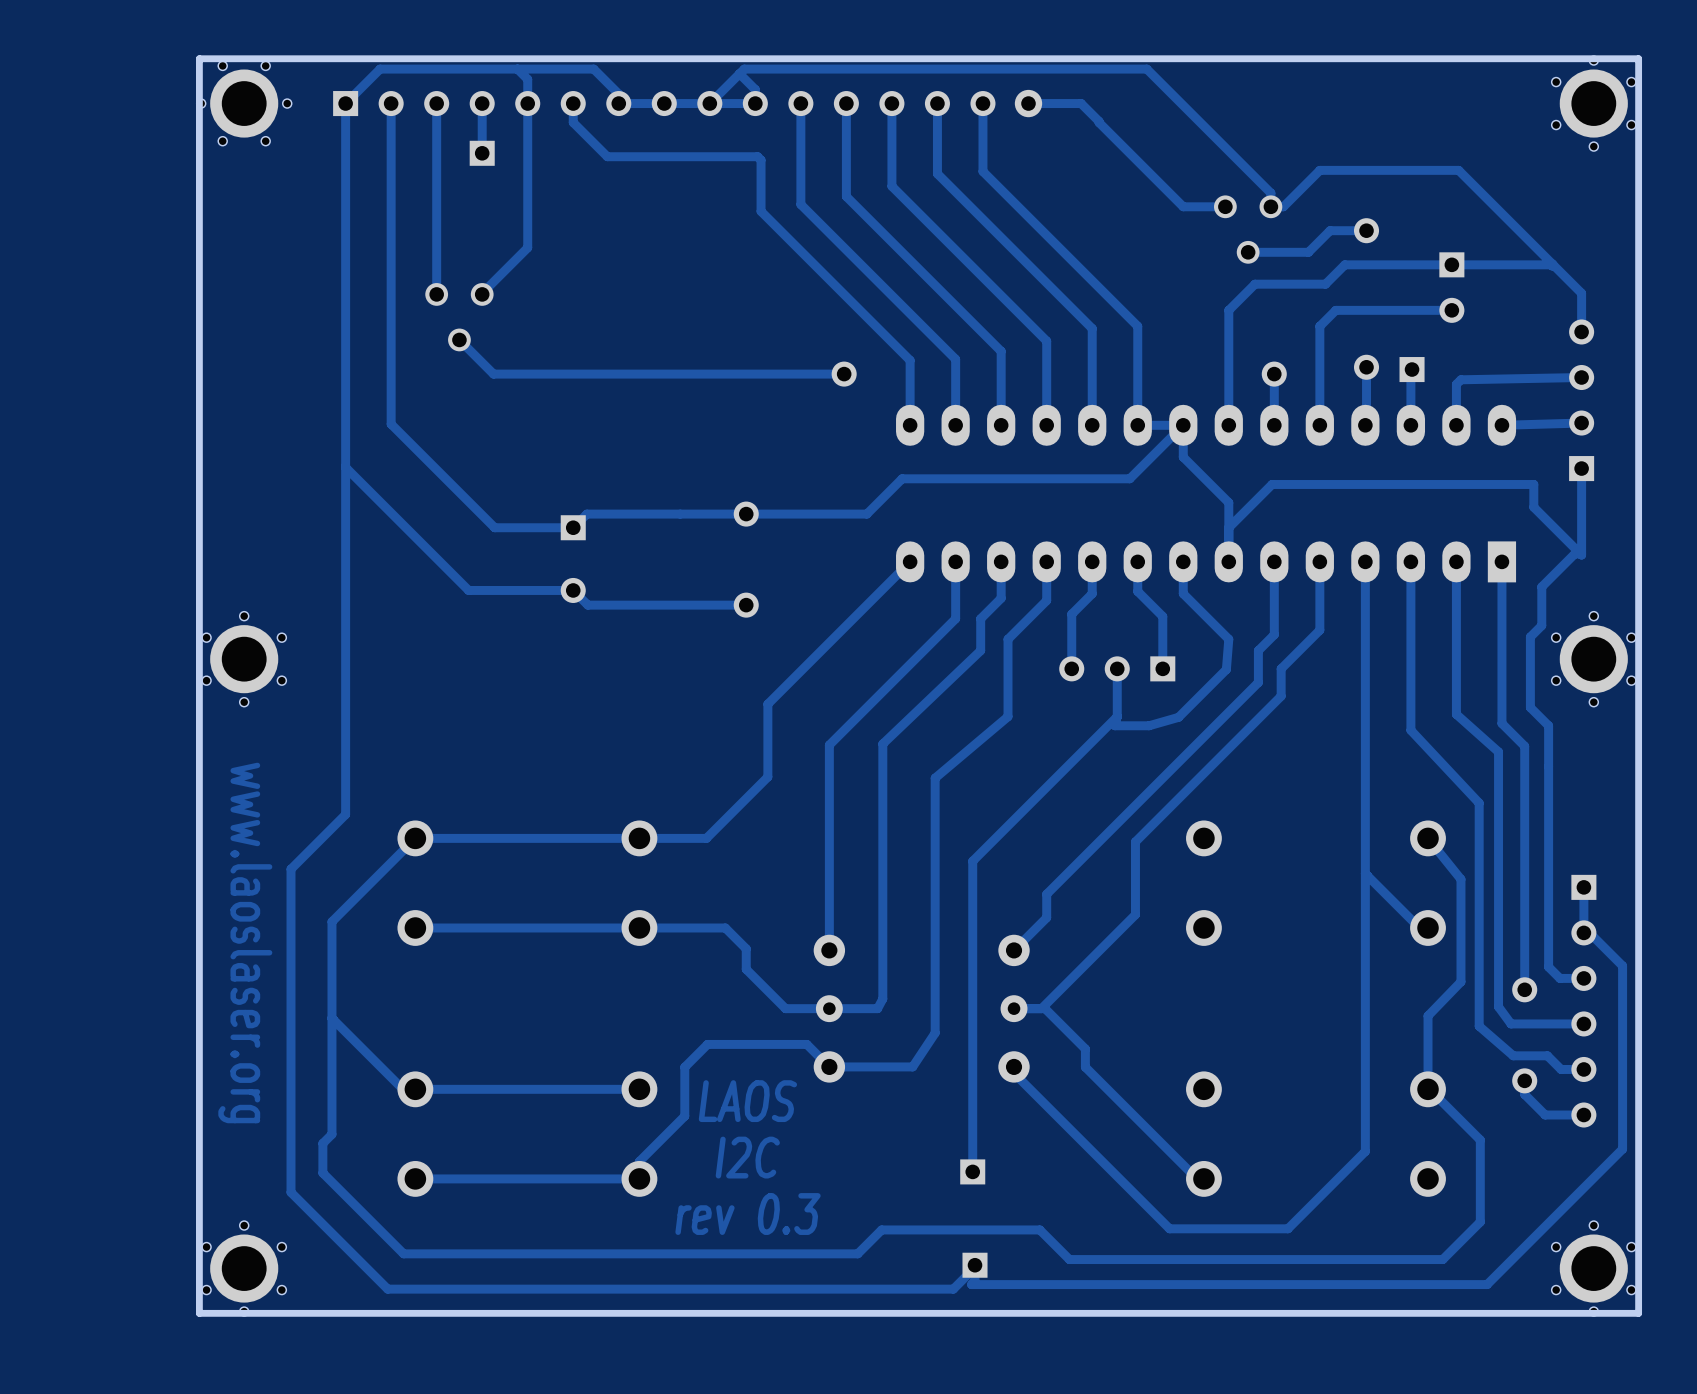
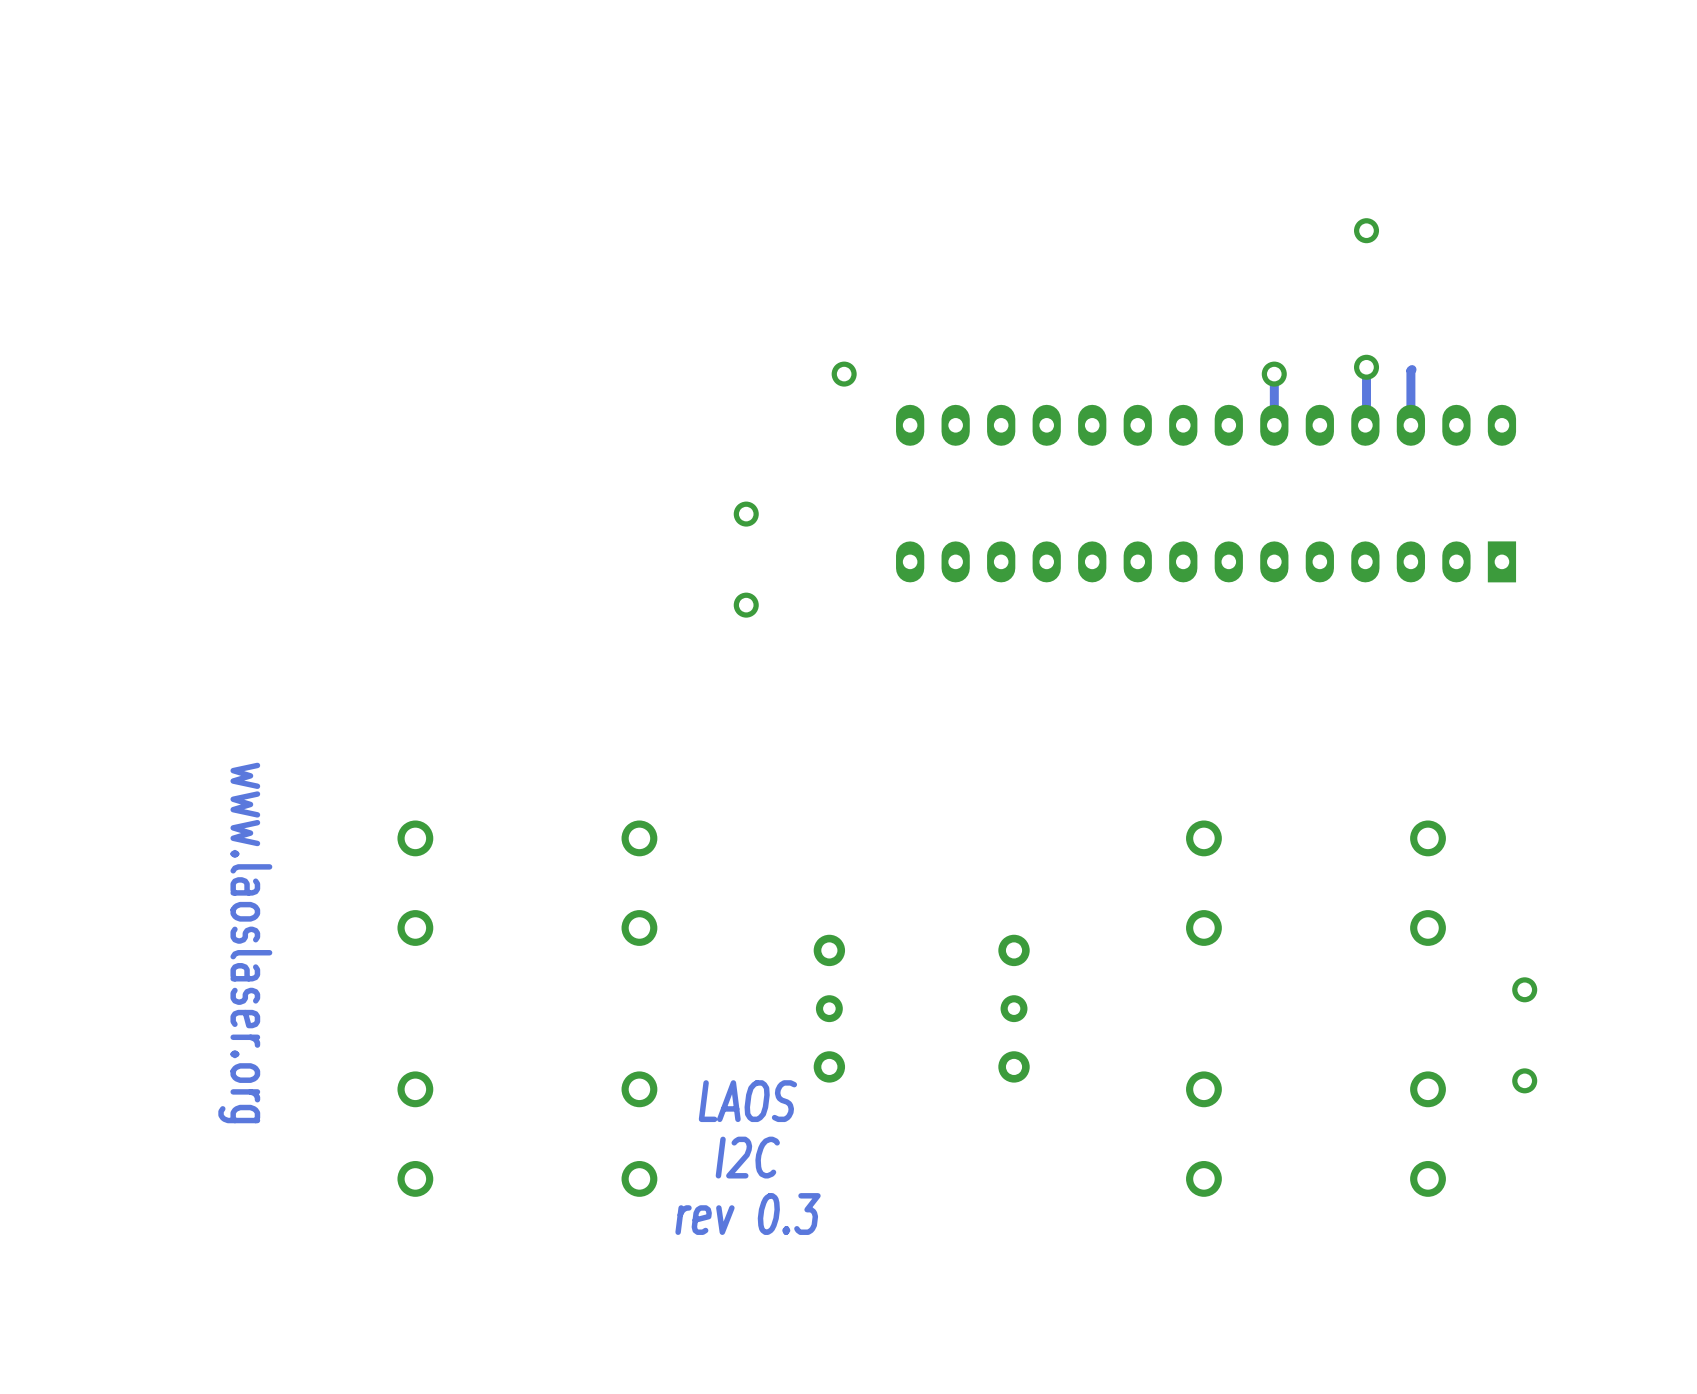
board edge: (1638, 58) (1638, 1313) (199, 1313) (199, 58) (1638, 58) -> none
track: (517, 69) (527, 79) (527, 247) (482, 294) -> none
track: (739, 73) (755, 89) (755, 103) (618, 103) (618, 94) (593, 69) (380, 69) (345, 103) (345, 814) (291, 869) (291, 1192) (387, 1289) (953, 1289) (975, 1267) -> none
part: (244, 103) -> none
track: (391, 103) (391, 424) (494, 527) (573, 527) (586, 514) (866, 514) (902, 478) (1129, 478) (1183, 425) -> none
track: (436, 103) (436, 294) -> none
track: (482, 103) (482, 153) -> none
track: (573, 103) (573, 122) (607, 156) (757, 156) (761, 160) (761, 211) (910, 360) (910, 425) -> none
part: (687, 103) -> none
track: (709, 103) (744, 69) (1146, 69) (1270, 193) (1270, 206) (1283, 206) (1319, 170) (1458, 170) (1581, 293) (1581, 331) -> none
track: (800, 103) (800, 204) (955, 359) (955, 425) -> none
track: (846, 103) (846, 196) (1001, 351) (1001, 425) -> none
track: (891, 103) (891, 186) (1046, 341) (1046, 425) -> none
track: (937, 103) (937, 173) (1092, 328) (1092, 425) -> none
track: (982, 103) (982, 171) (1137, 326) (1137, 425) (1183, 425) -> none
track: (1028, 103) (1081, 103) (1183, 206) (1225, 206) -> none
part: (1593, 103) -> none
part: (482, 153) -> none
part: (1248, 229) -> none
track: (1366, 230) (1330, 230) (1308, 252) (1248, 252) -> none
track: (1552, 263) (1552, 265) (1553, 264) (1344, 264) (1325, 284) (1254, 284) (1228, 310) (1228, 425) -> none
part: (1451, 287) -> none
track: (1451, 310) (1335, 310) (1319, 326) (1319, 425) -> none
part: (459, 317) -> none
track: (459, 339) (493, 374) (844, 374) -> none
part: (1412, 369) -> none
track: (1581, 377) (1460, 379) (1456, 384) (1456, 425) -> none
part: (1581, 400) -> none
track: (1581, 423) (1501, 425) -> none
track: (1183, 425) (1183, 457) (1228, 502) (1228, 561) -> none
track: (345, 467) (468, 590) (573, 590) (587, 605) (746, 605) -> none
track: (1581, 468) (1581, 555) (1533, 507) (1533, 484) (1272, 484) (1228, 527) -> none
track: (1581, 553) (1574, 553) (1541, 586) (1541, 625) (1530, 637) (1530, 707) (1548, 725) (1548, 967) (1559, 978) (1583, 978) -> none
part: (573, 559) -> none
track: (910, 561) (767, 704) (767, 776) (706, 838) (415, 838) (331, 921) (331, 1134) (322, 1143) (322, 1173) (403, 1253) (857, 1253) (881, 1229) (1039, 1229) (1069, 1259) (1442, 1259) (1480, 1221) (1480, 1140) (1428, 1089) (1428, 1015) (1460, 981) (1460, 879) (1428, 838) -> none
track: (955, 561) (955, 618) (829, 745) (829, 950) -> none
track: (1001, 561) (1001, 598) (980, 618) (980, 650) (882, 743) (882, 998) (877, 1008) (785, 1008) (746, 969) (746, 948) (725, 927) (415, 927) -> none
track: (1046, 561) (1046, 600) (1008, 639) (1008, 716) (935, 778) (935, 1033) (912, 1066) (829, 1066) (806, 1044) (707, 1044) (684, 1067) (684, 1116) (639, 1161) (639, 1178) (415, 1178) -> none
track: (1092, 561) (1092, 593) (1071, 614) (1071, 668) -> none
track: (1137, 561) (1137, 591) (1162, 616) (1162, 668) -> none
track: (1183, 561) (1183, 593) (1228, 639) (1226, 669) (1178, 717) (1149, 725) (1114, 725) (1117, 716) -> none
track: (1274, 561) (1274, 634) (1258, 650) (1258, 682) (1046, 894) (1046, 917) (1014, 950) -> none
track: (1319, 561) (1319, 630) (1281, 668) (1281, 696) (1135, 841) (1135, 914) (1041, 1008) -> none
track: (1365, 561) (1365, 1151) (1287, 1228) (1169, 1228) (1014, 1073) (1014, 1066) -> none
track: (1410, 561) (1410, 730) (1479, 803) (1479, 1026) (1513, 1055) (1547, 1055) (1561, 1069) (1583, 1069) -> none
track: (1456, 561) (1456, 714) (1498, 751) (1498, 1006) (1511, 1023) (1583, 1023) -> none
track: (1501, 561) (1501, 723) (1524, 746) (1524, 989) -> none
part: (244, 659) -> none
part: (1593, 659) -> none
track: (1117, 668) (1117, 716) -> none
part: (1117, 668) -> none
track: (1117, 716) (972, 861) (972, 1171) -> none
track: (1365, 873) (1419, 927) (1428, 927) -> none
track: (1583, 887) (1583, 932) (1589, 932) (1622, 965) (1622, 1149) (1487, 1284) (971, 1284) (975, 1281) (975, 1265) -> none
part: (1583, 1001) -> none
track: (1014, 1008) (1045, 1008) (1085, 1048) (1085, 1067) (1197, 1178) (1203, 1178) -> none
track: (331, 1018) (403, 1089) (639, 1089) -> none
track: (1524, 1080) (1524, 1094) (1545, 1115) (1583, 1115) -> none
part: (972, 1171) -> none
part: (975, 1265) -> none
part: (244, 1268) -> none
part: (1593, 1268) -> none

